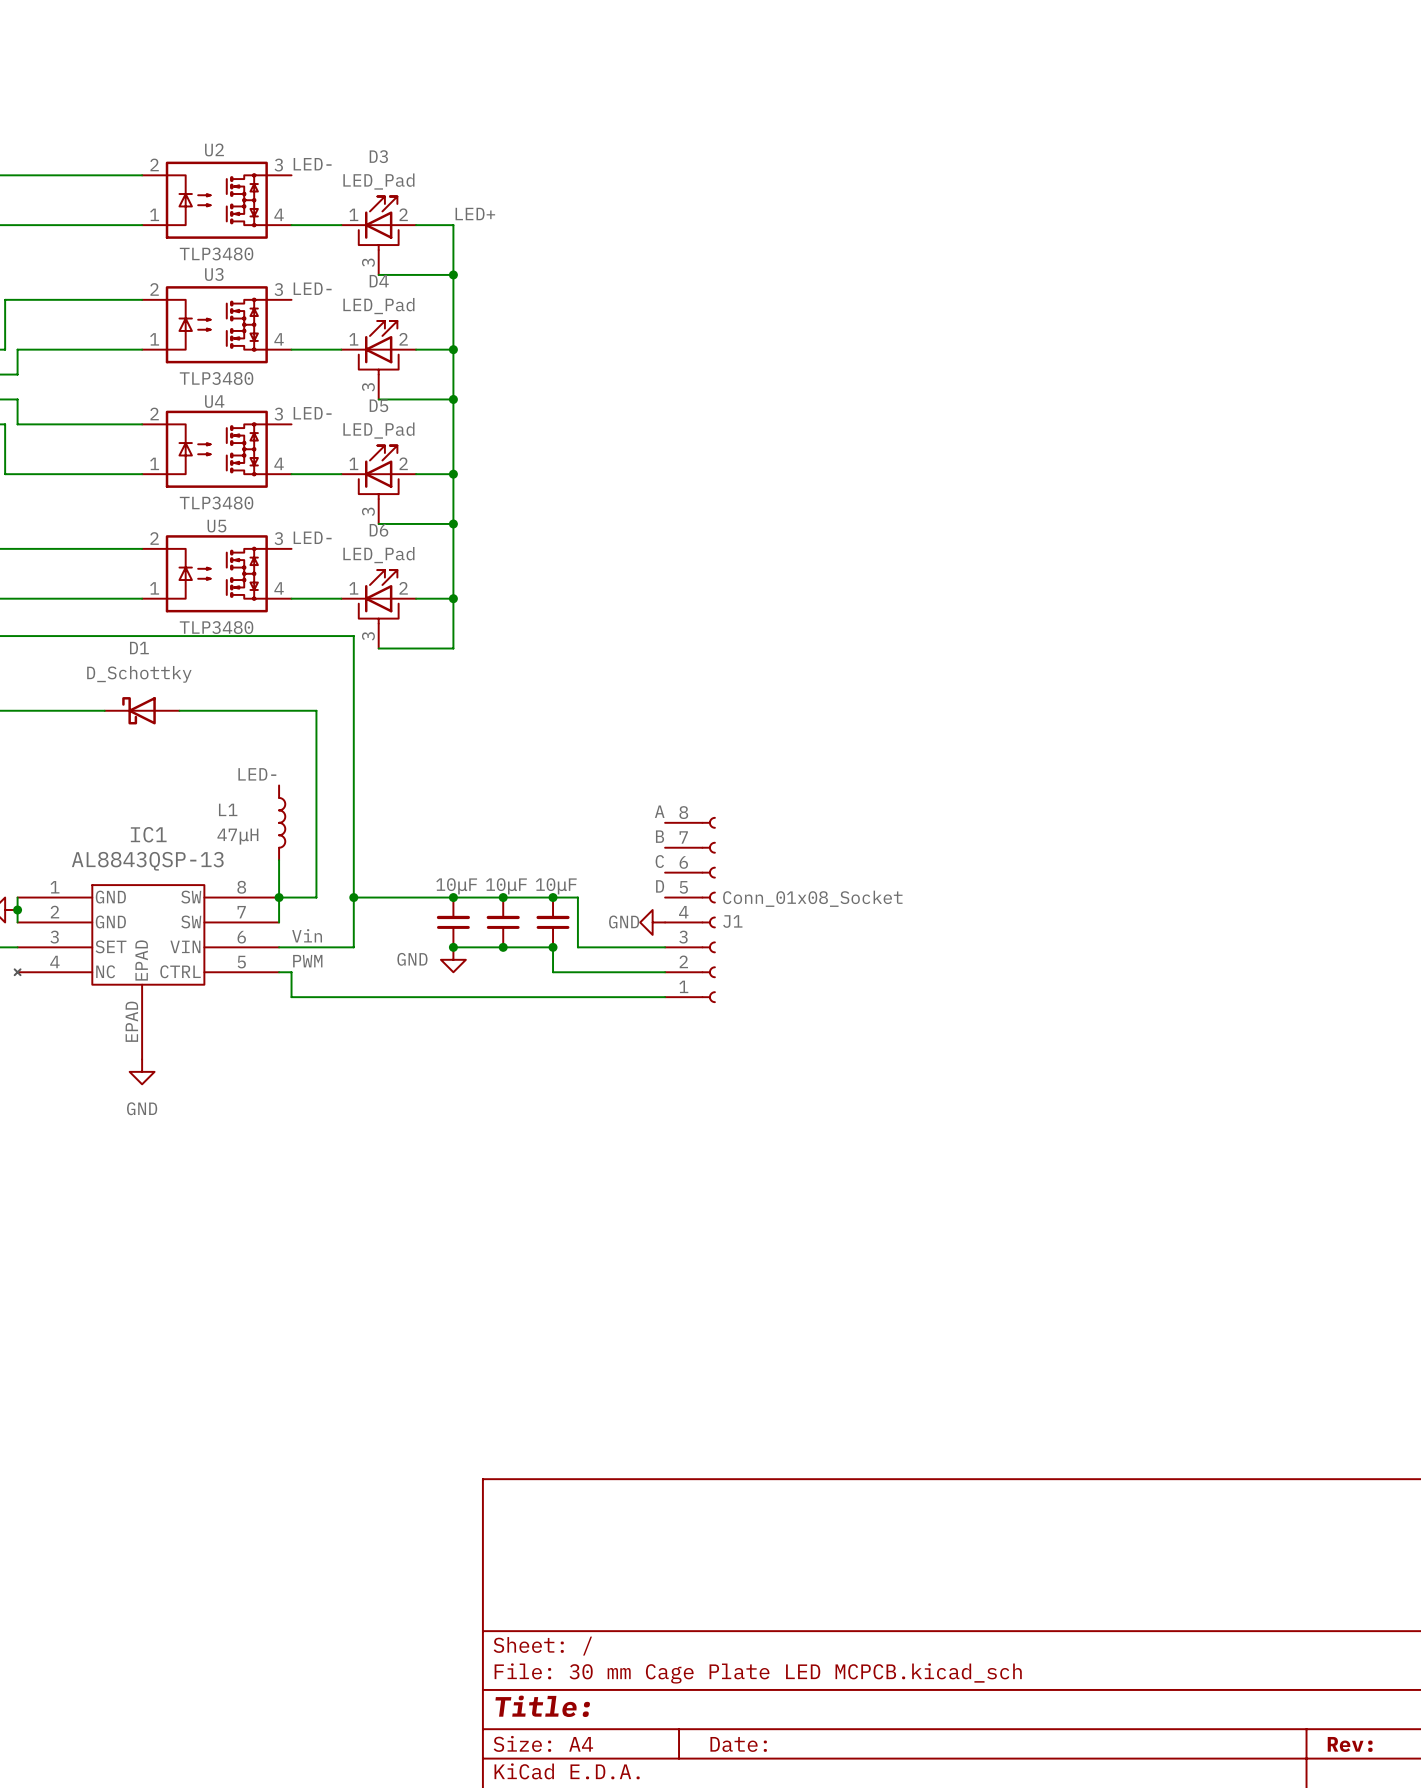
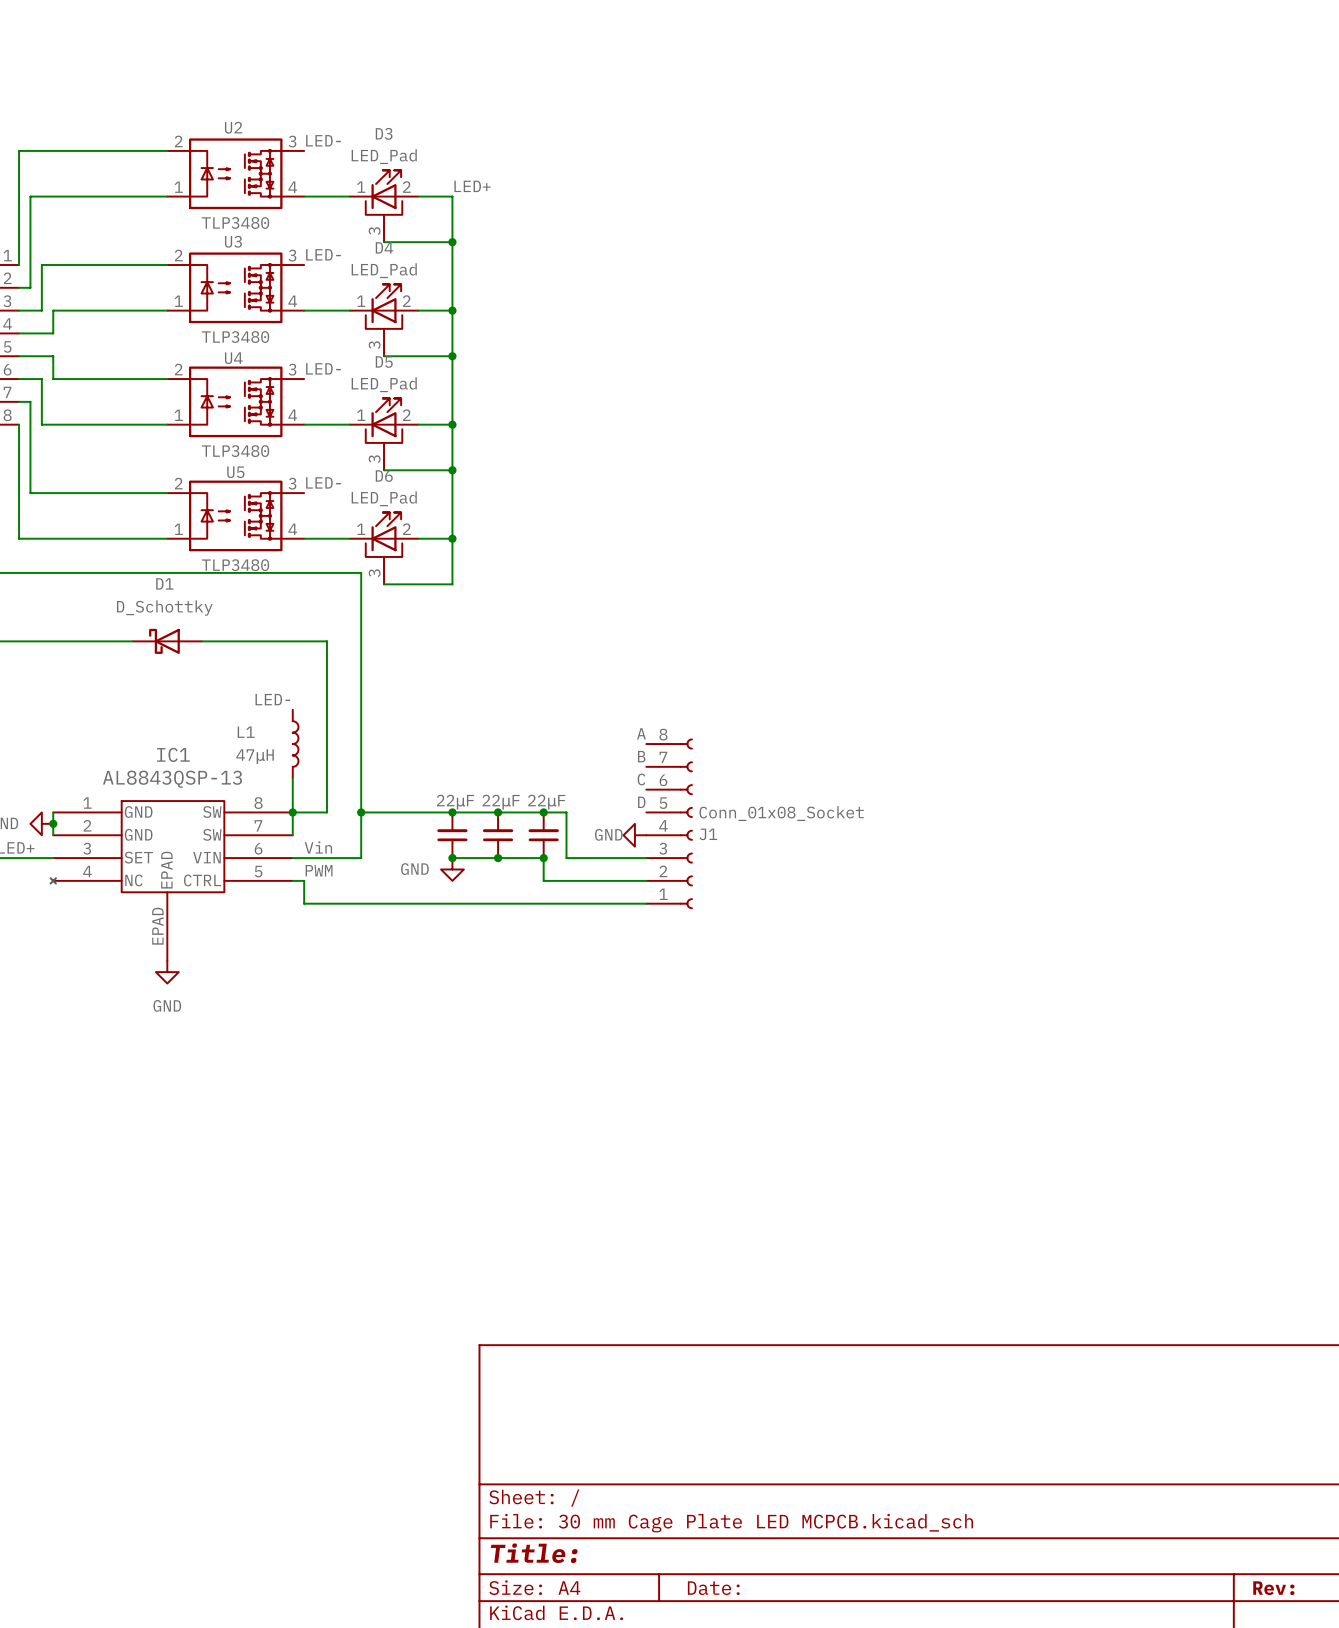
part value: 10μF (456, 886) -> 22μF (455, 802)
part value: 10μF (506, 886) -> 22μF (501, 802)
part value: 10μF (556, 886) -> 22μF (546, 802)

